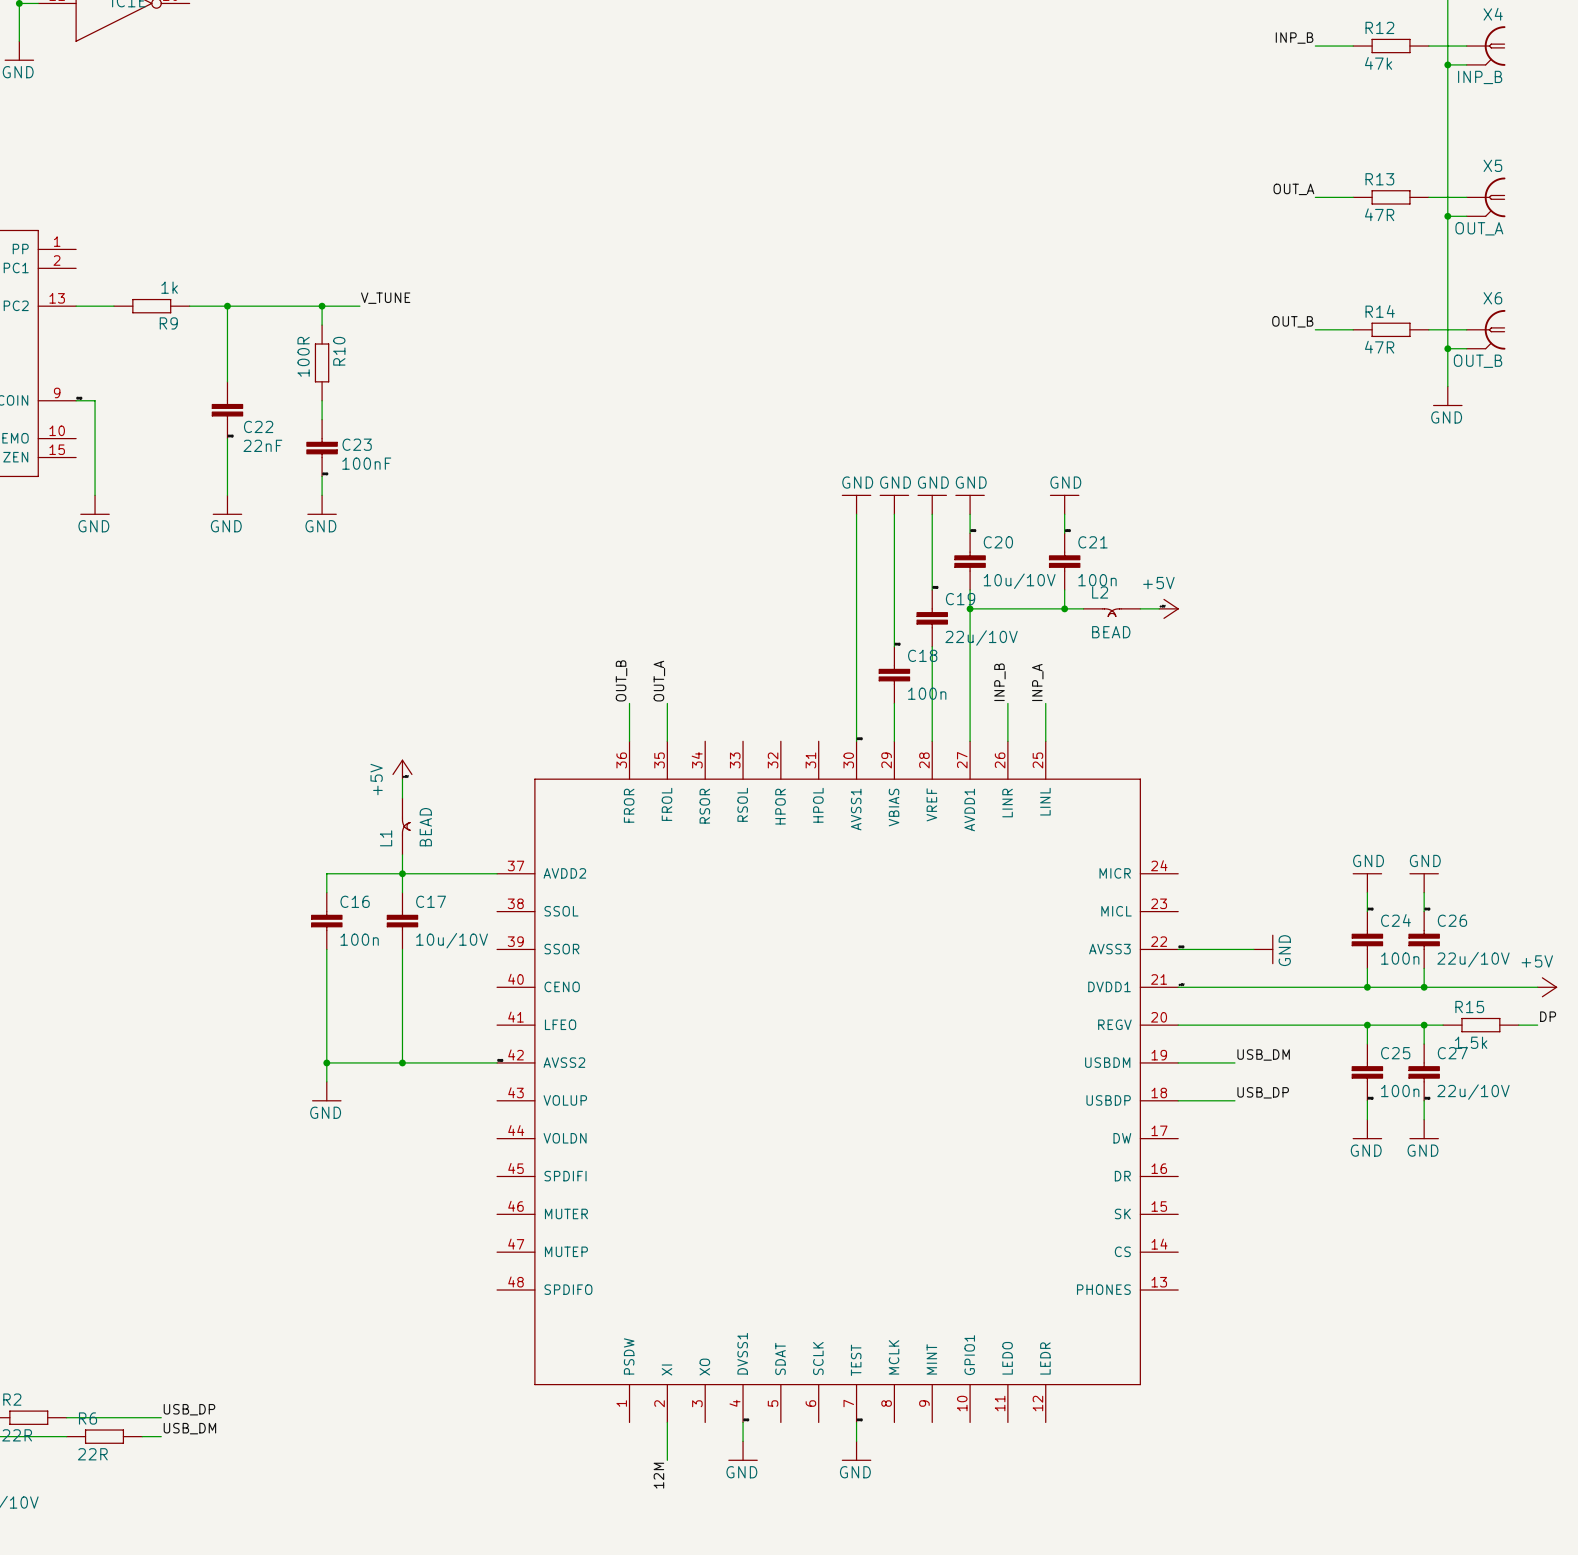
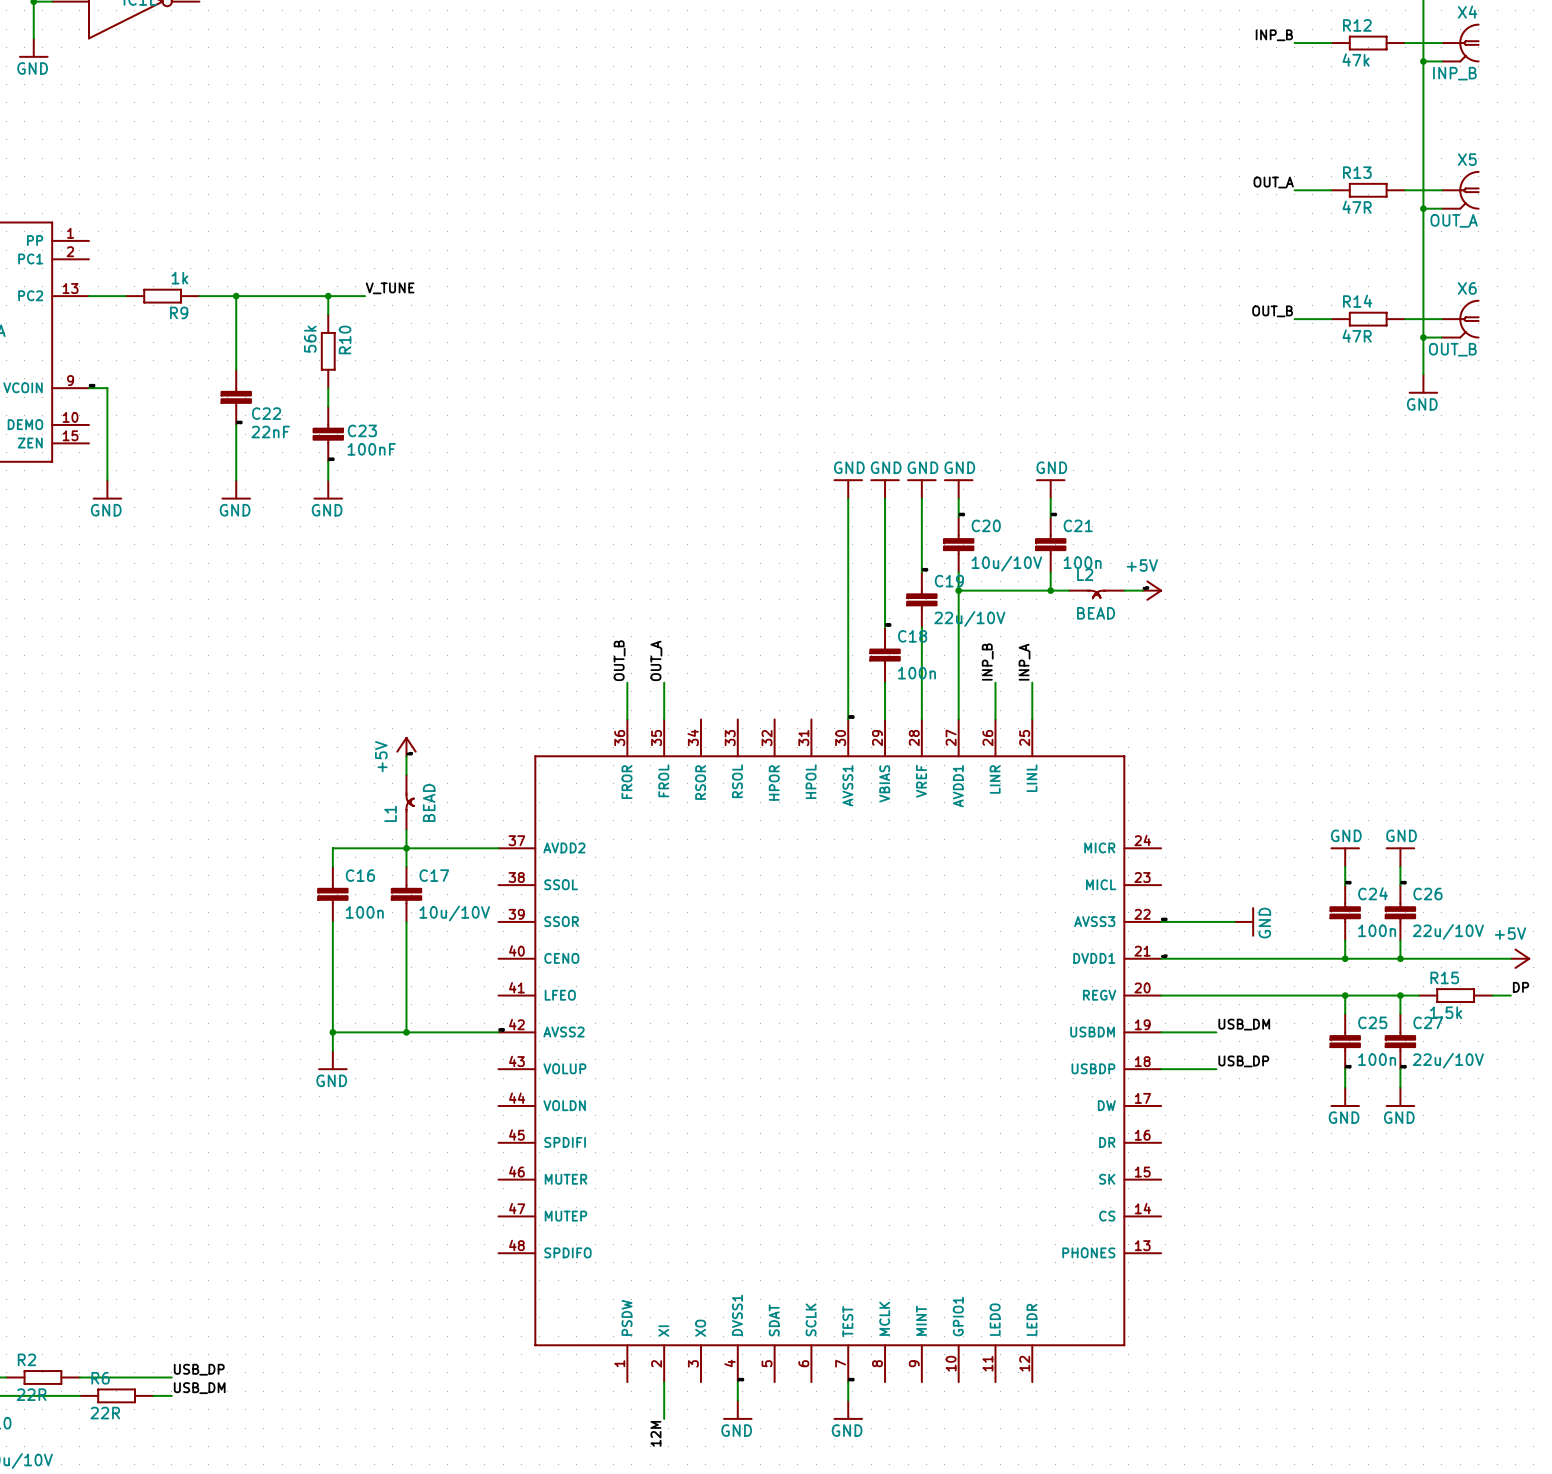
R10 value: 100R (303, 356) -> 56k (310, 339)

